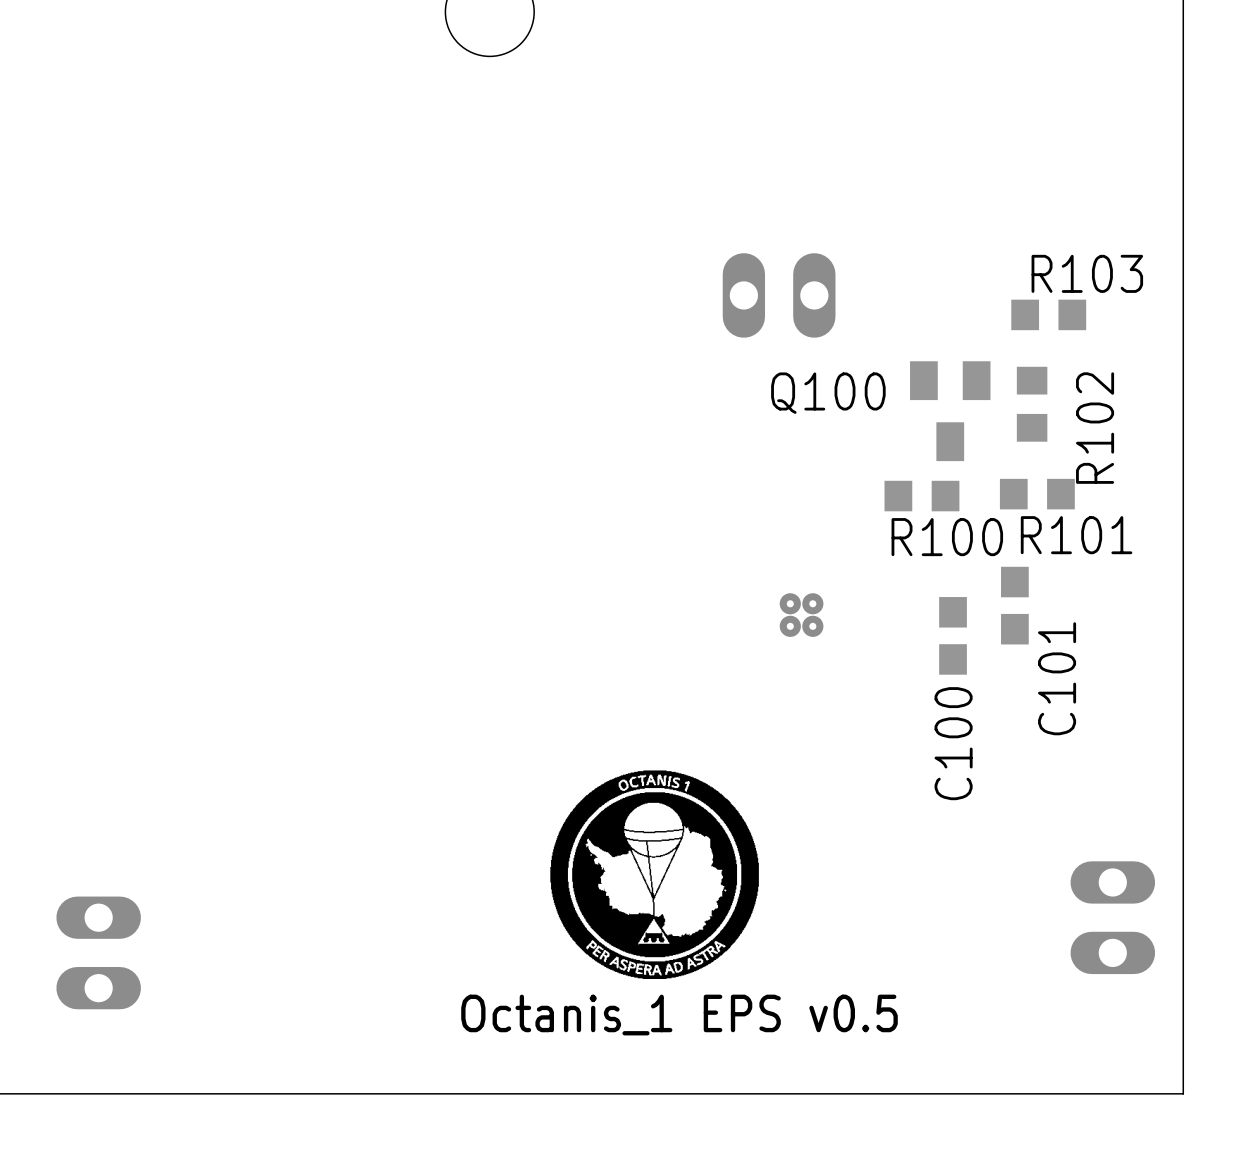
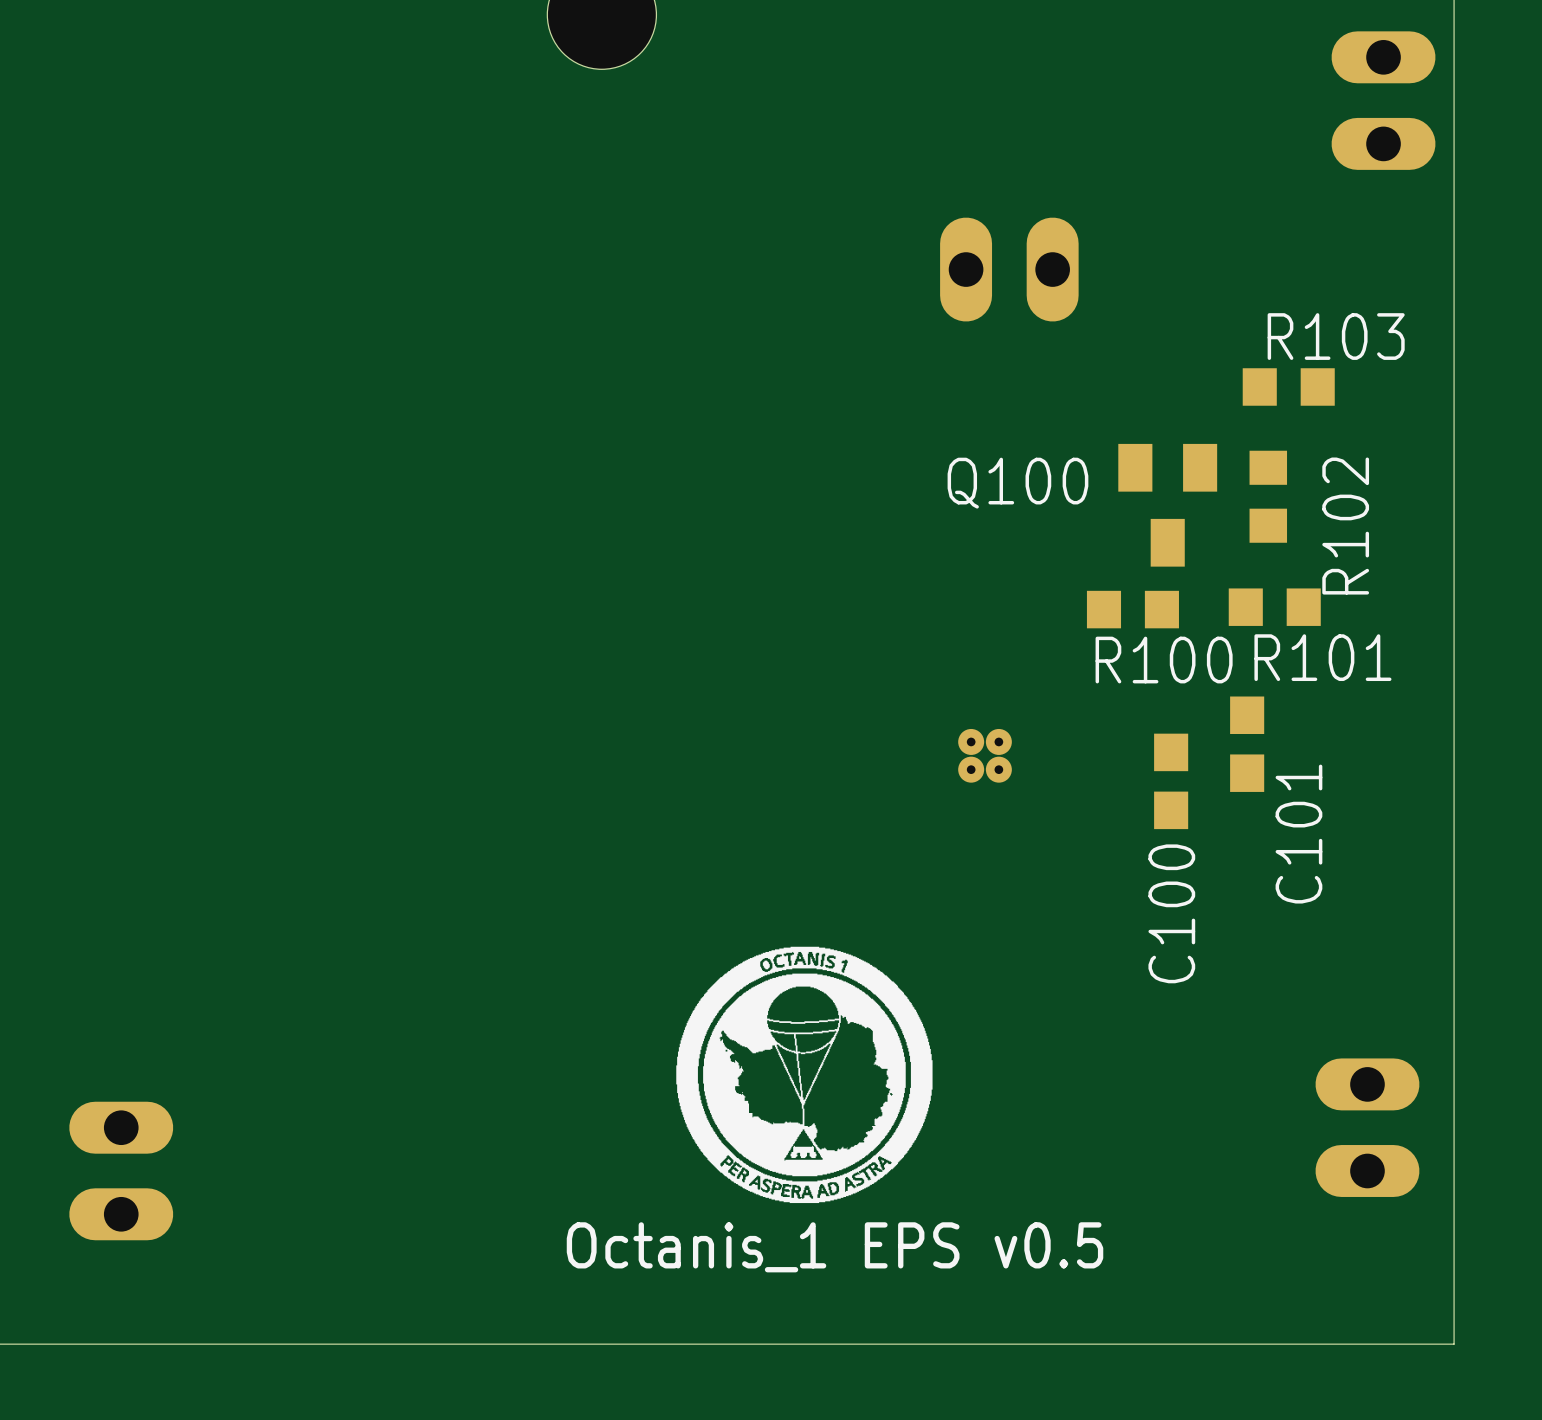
part: none -> (1383, 100)
part position: (779, 295) -> (1009, 269)

